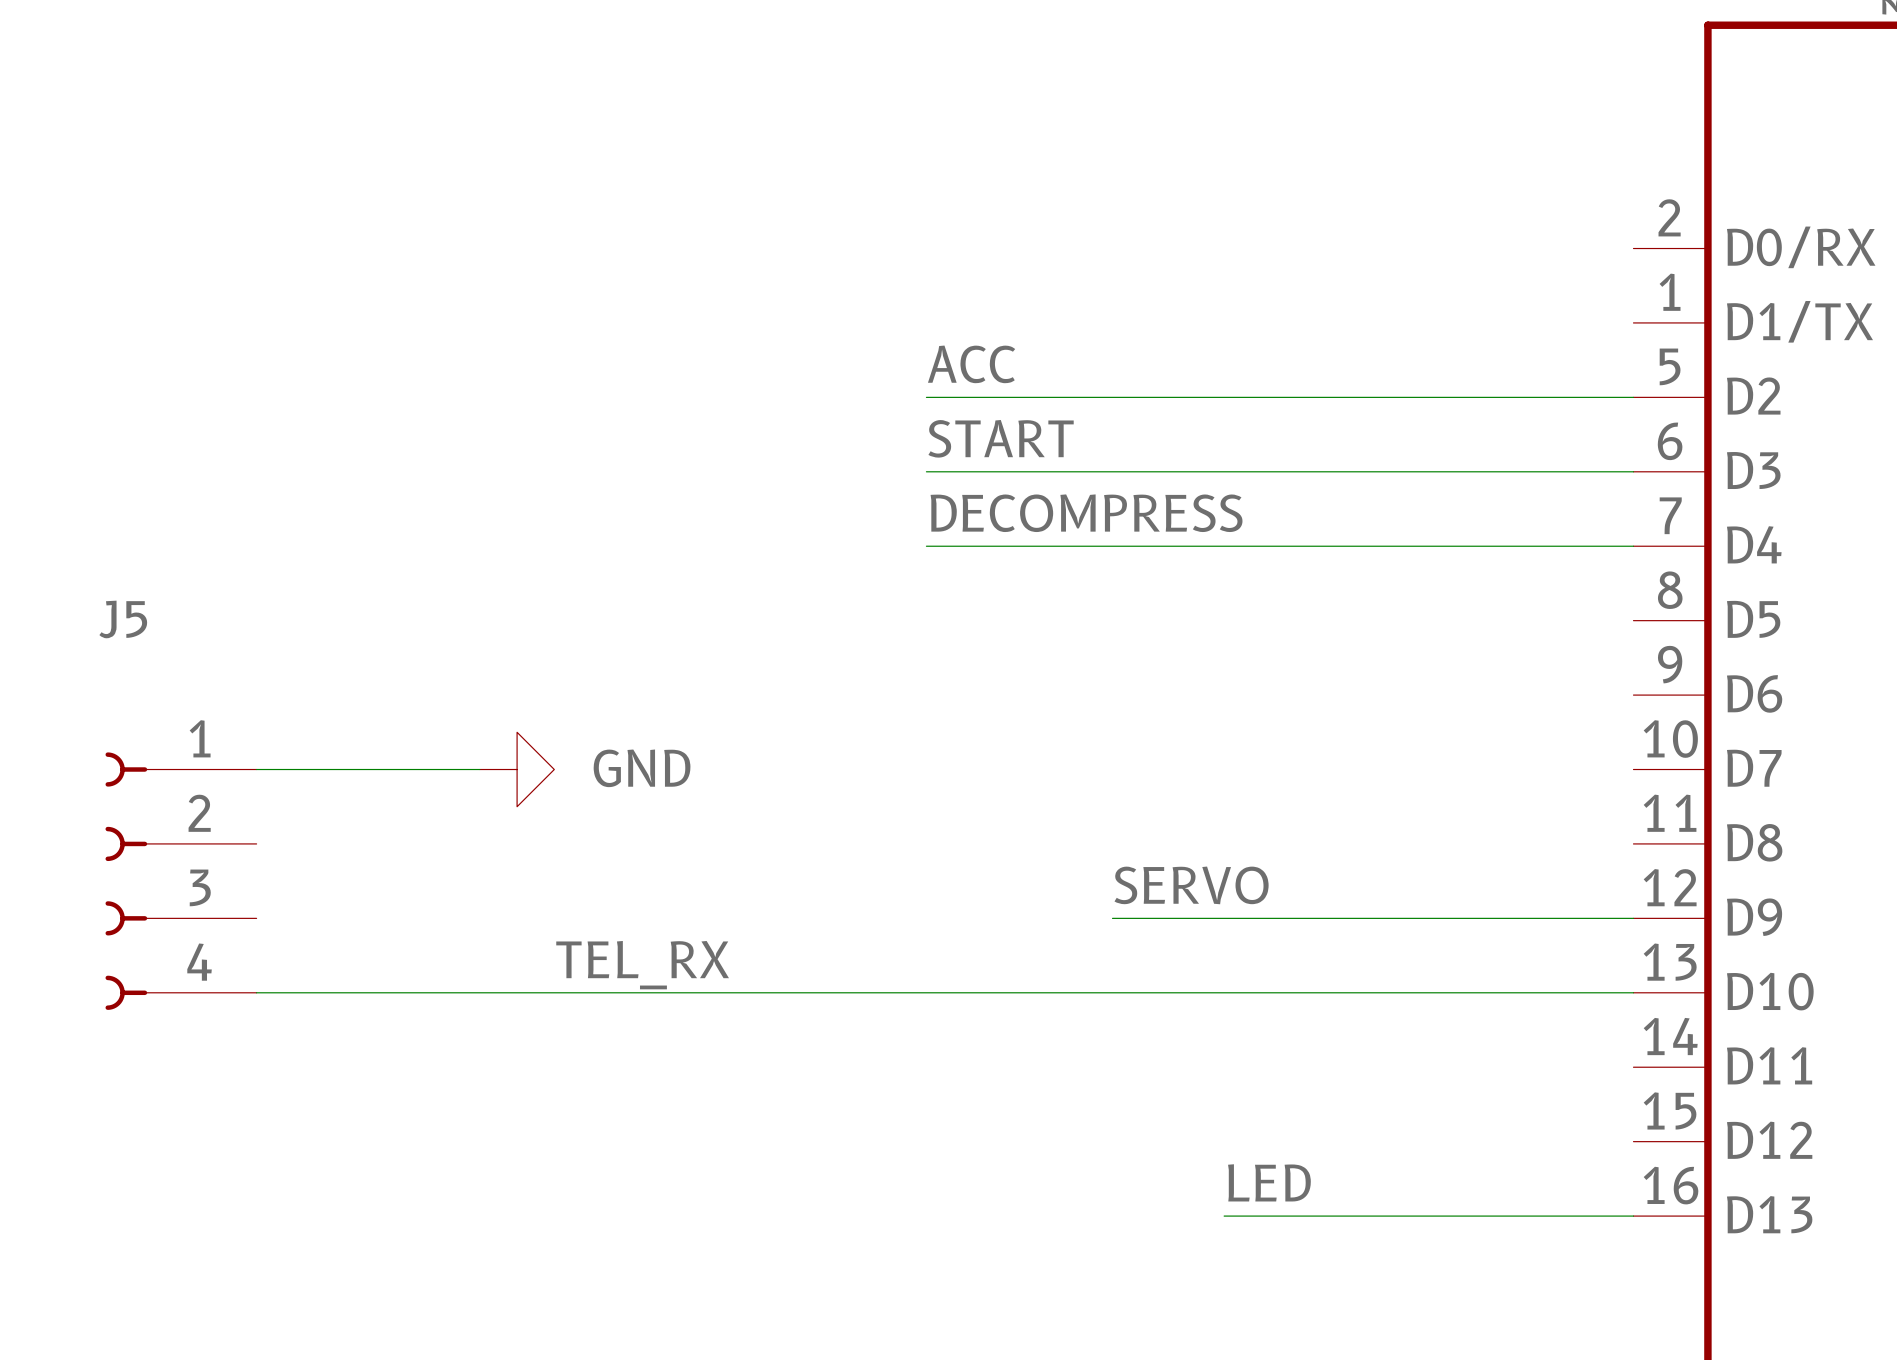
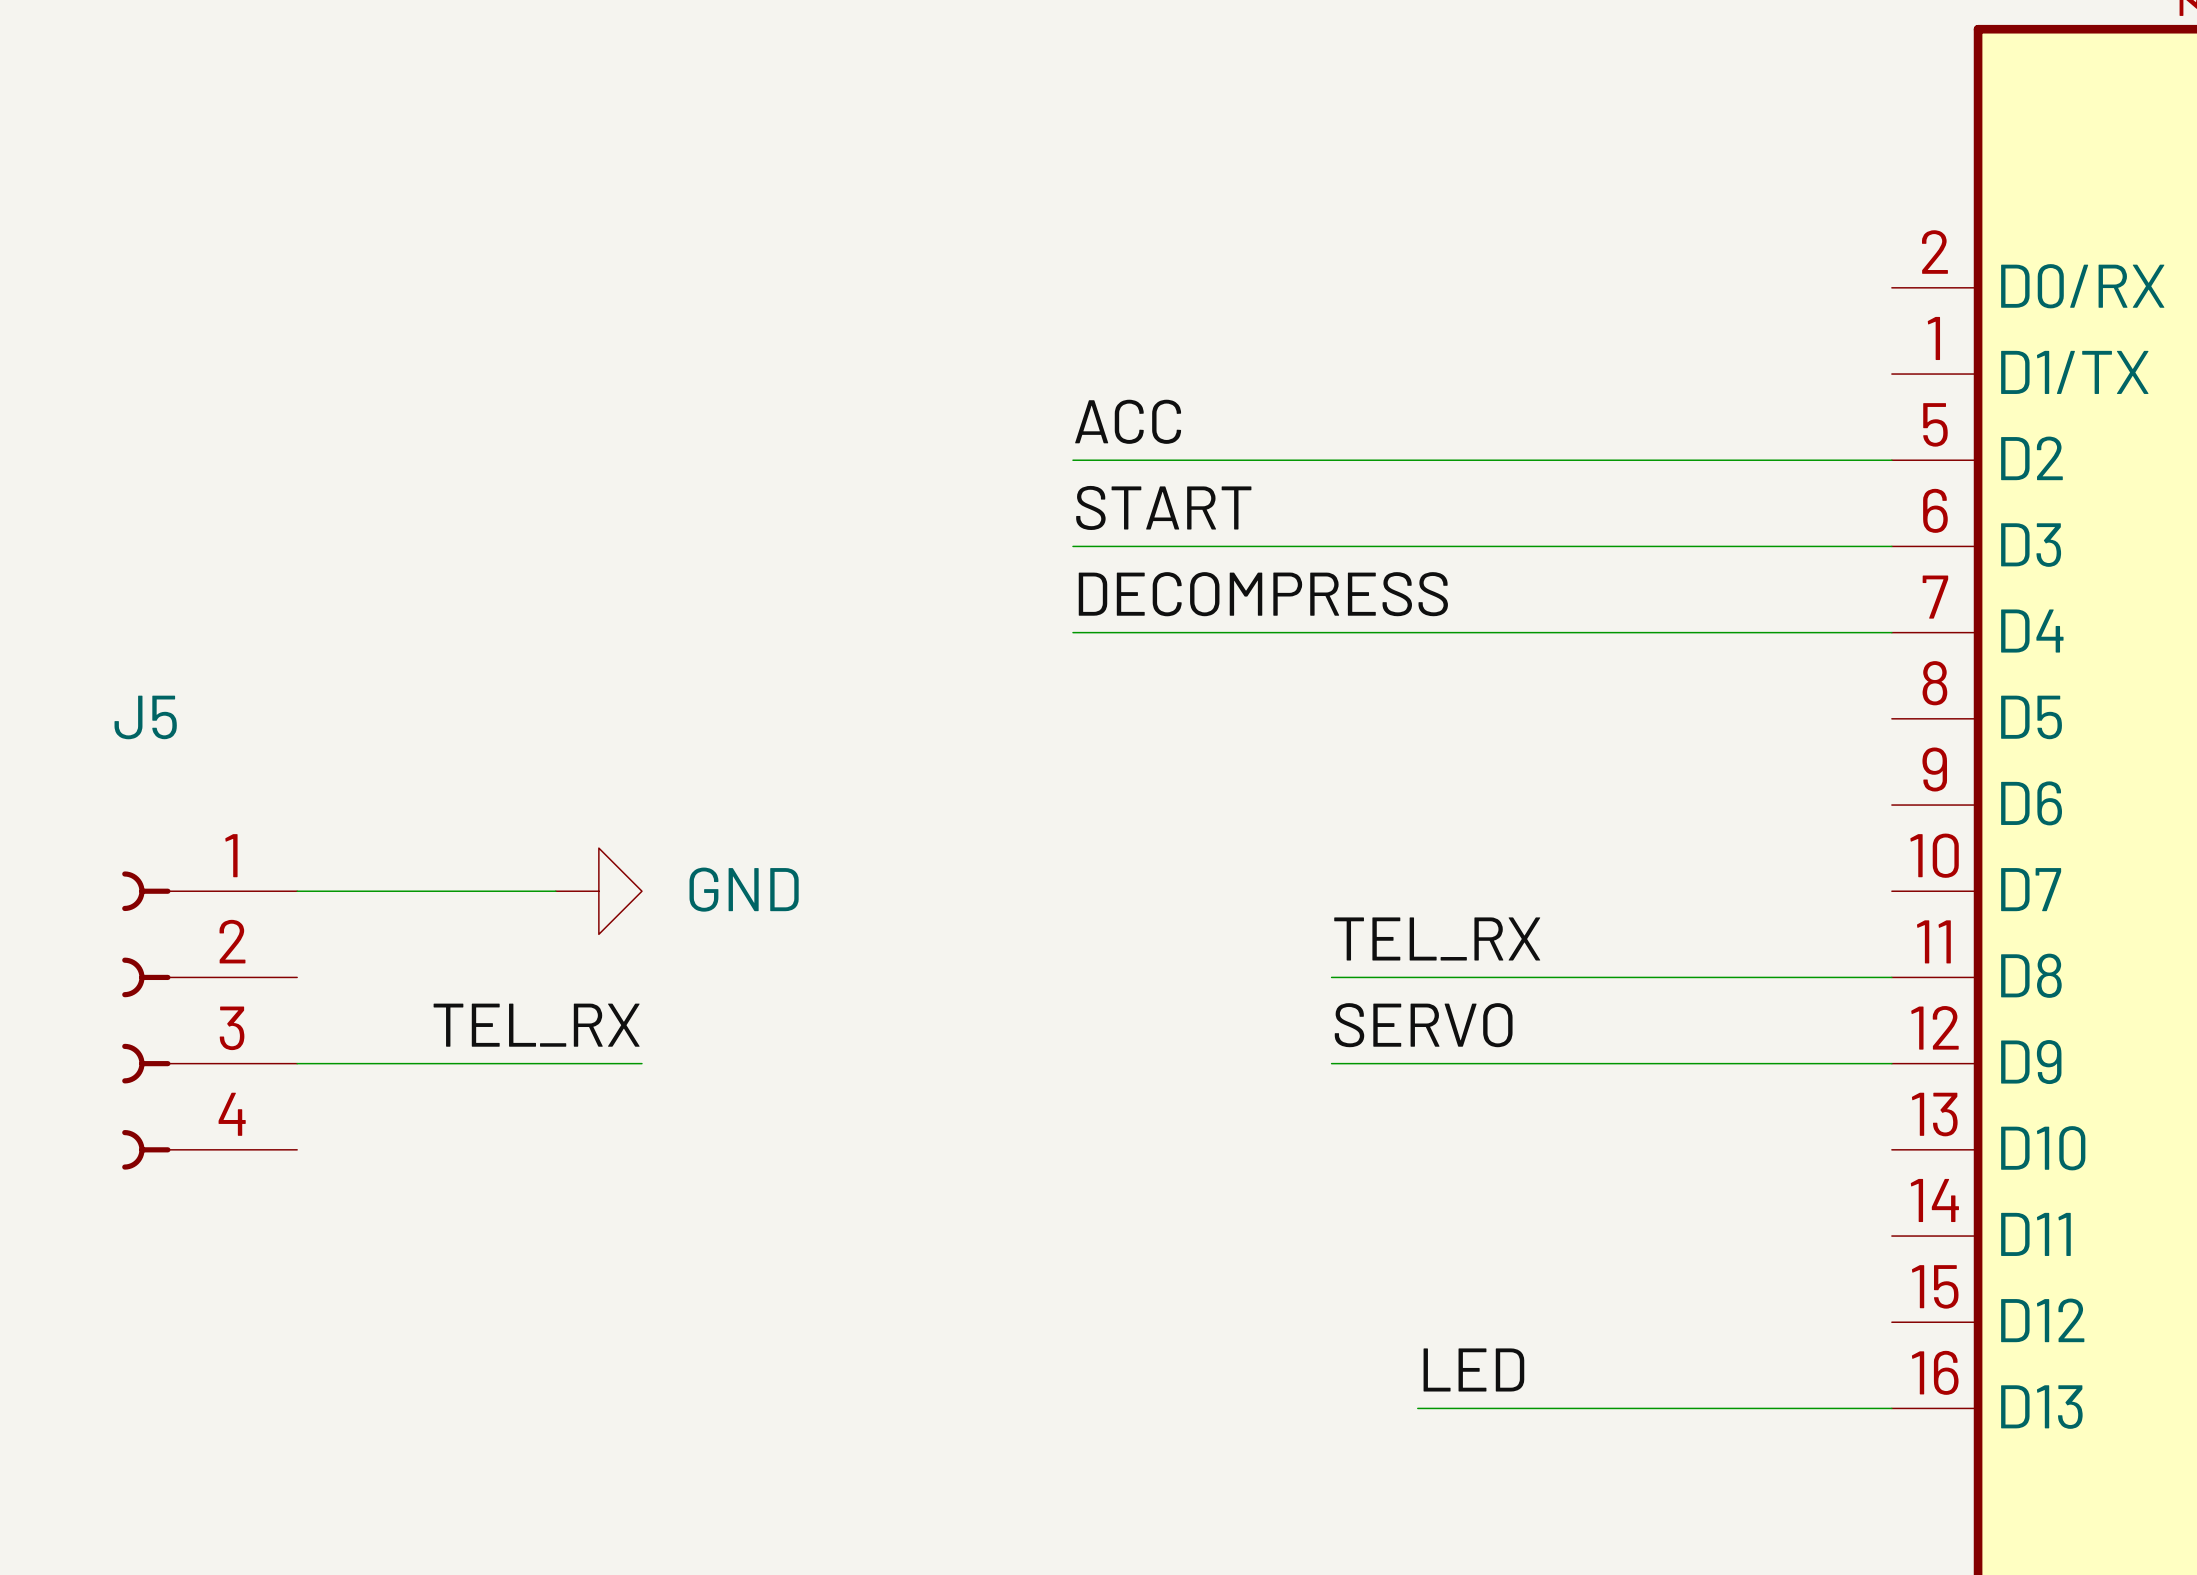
label: none -> TEL_RX (1437, 938)
wire: none -> (1331, 977) (1891, 977)
label position: SERVO (1191, 885) -> SERVO (1423, 1025)
wire: none -> (297, 1063) (641, 1063)
wire: (1112, 918) (1149, 918) -> none
label position: TEL_RX (642, 965) -> TEL_RX (536, 1025)
wire: (256, 992) (1633, 992) -> none

